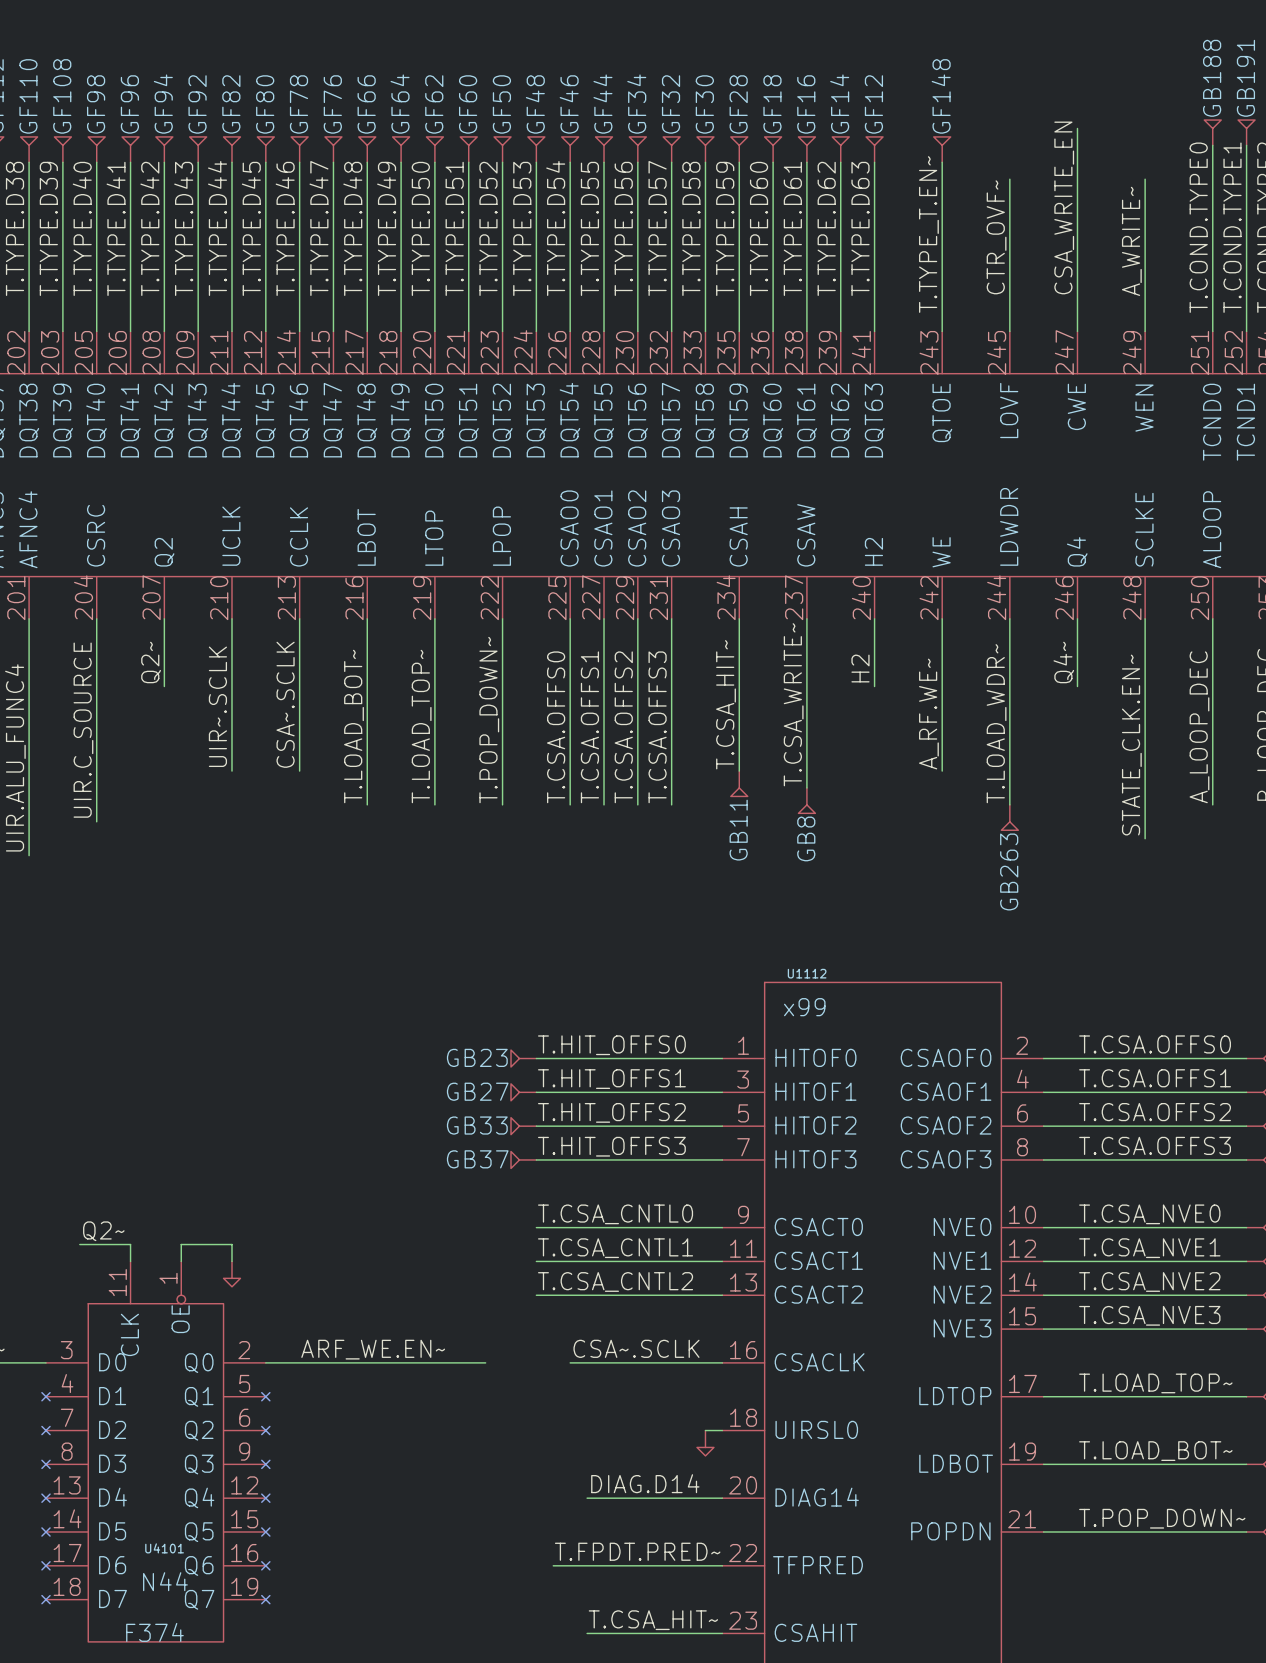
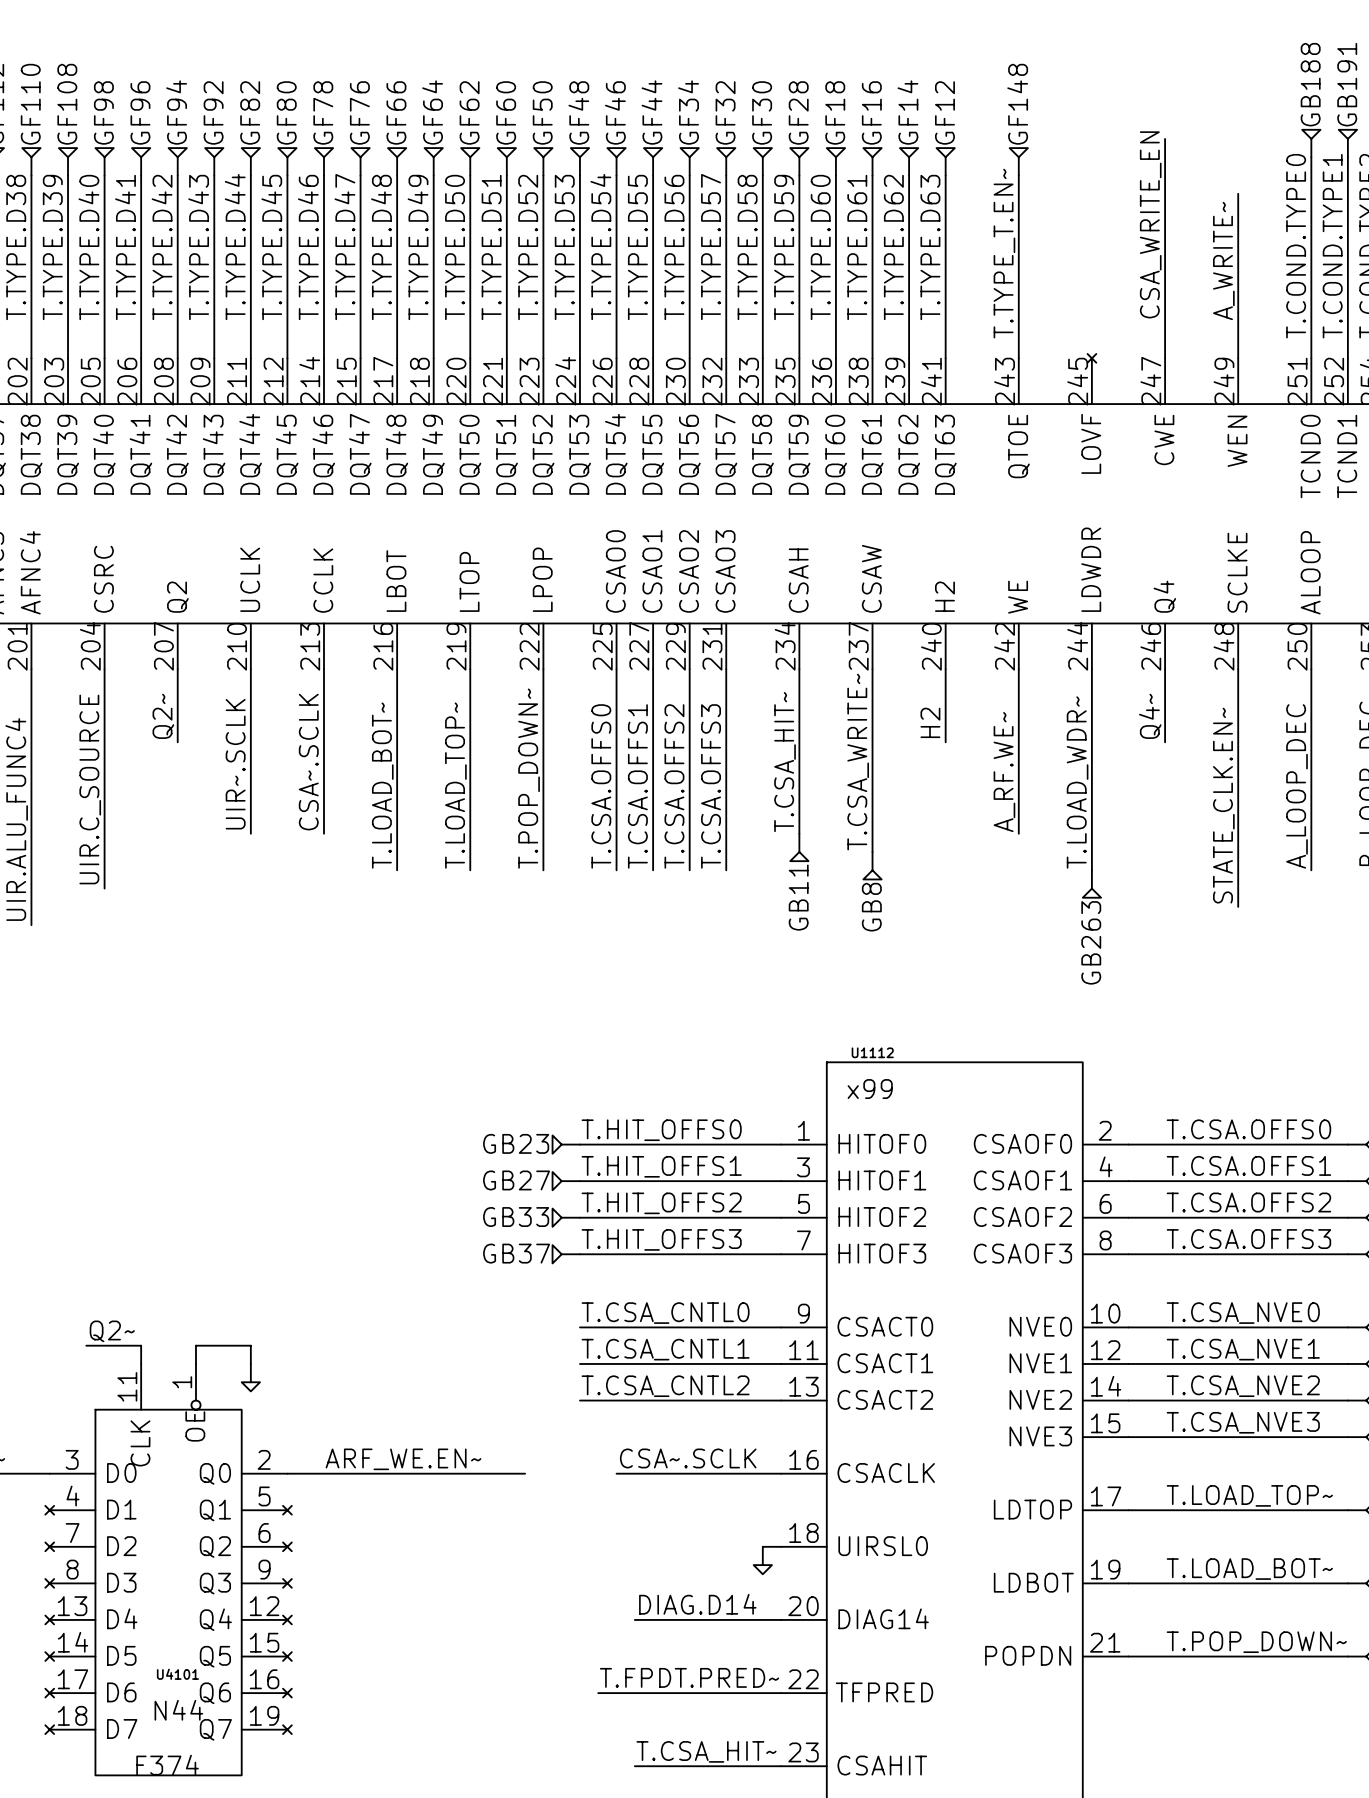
wire: (1009, 179) (1009, 331) -> none
label: CTR_OVF~ (996, 237) -> none
no-connect mark: none -> (1091, 358)

